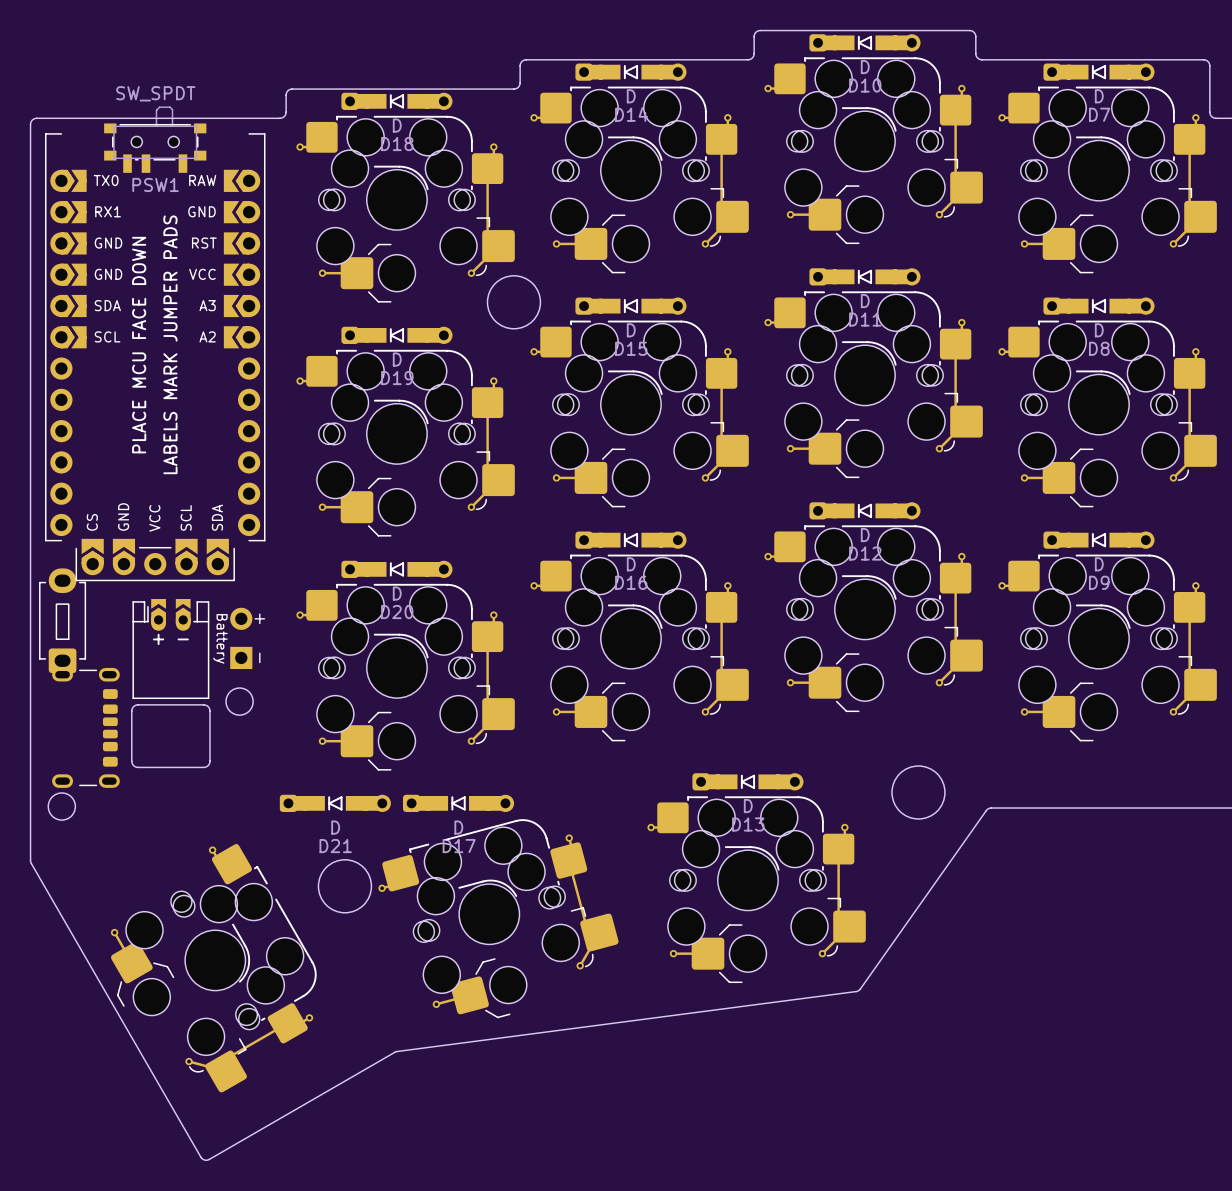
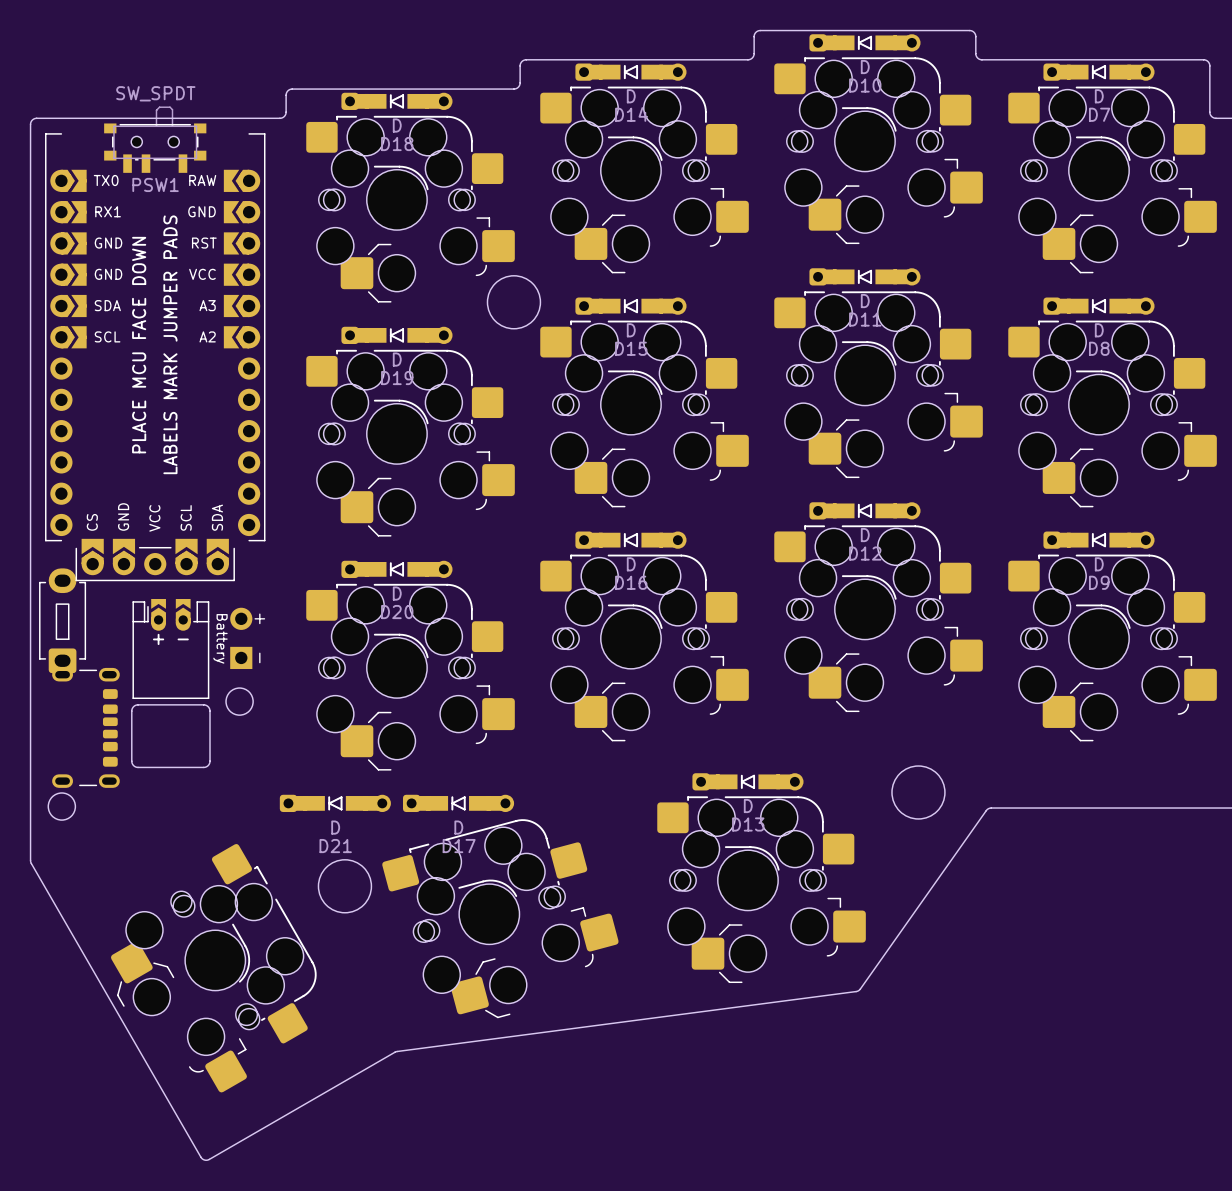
part footprint: [764, 57, 983, 245] -> [774, 57, 983, 245]
part footprint: [530, 86, 749, 274] -> [540, 86, 749, 274]
part footprint: [998, 86, 1217, 274] -> [1008, 86, 1217, 274]
part footprint: [296, 115, 515, 303] -> [306, 115, 515, 303]
part footprint: [764, 291, 983, 479] -> [774, 291, 983, 479]
part footprint: [530, 320, 749, 508] -> [540, 320, 749, 508]
part footprint: [998, 320, 1217, 508] -> [1008, 320, 1217, 508]
part footprint: [296, 349, 515, 537] -> [306, 349, 515, 537]
part footprint: [764, 525, 983, 713] -> [774, 525, 983, 713]
part footprint: [530, 554, 749, 742] -> [540, 554, 749, 742]
part footprint: [998, 554, 1217, 742] -> [1008, 554, 1217, 742]
part footprint: [296, 583, 515, 771] -> [306, 583, 515, 771]
part footprint: [647, 796, 866, 984] -> [657, 796, 866, 984]
part footprint: [378, 819, 619, 1019] -> [382, 819, 619, 1019]
part footprint: [110, 844, 317, 1093] -> [110, 844, 317, 1093]

